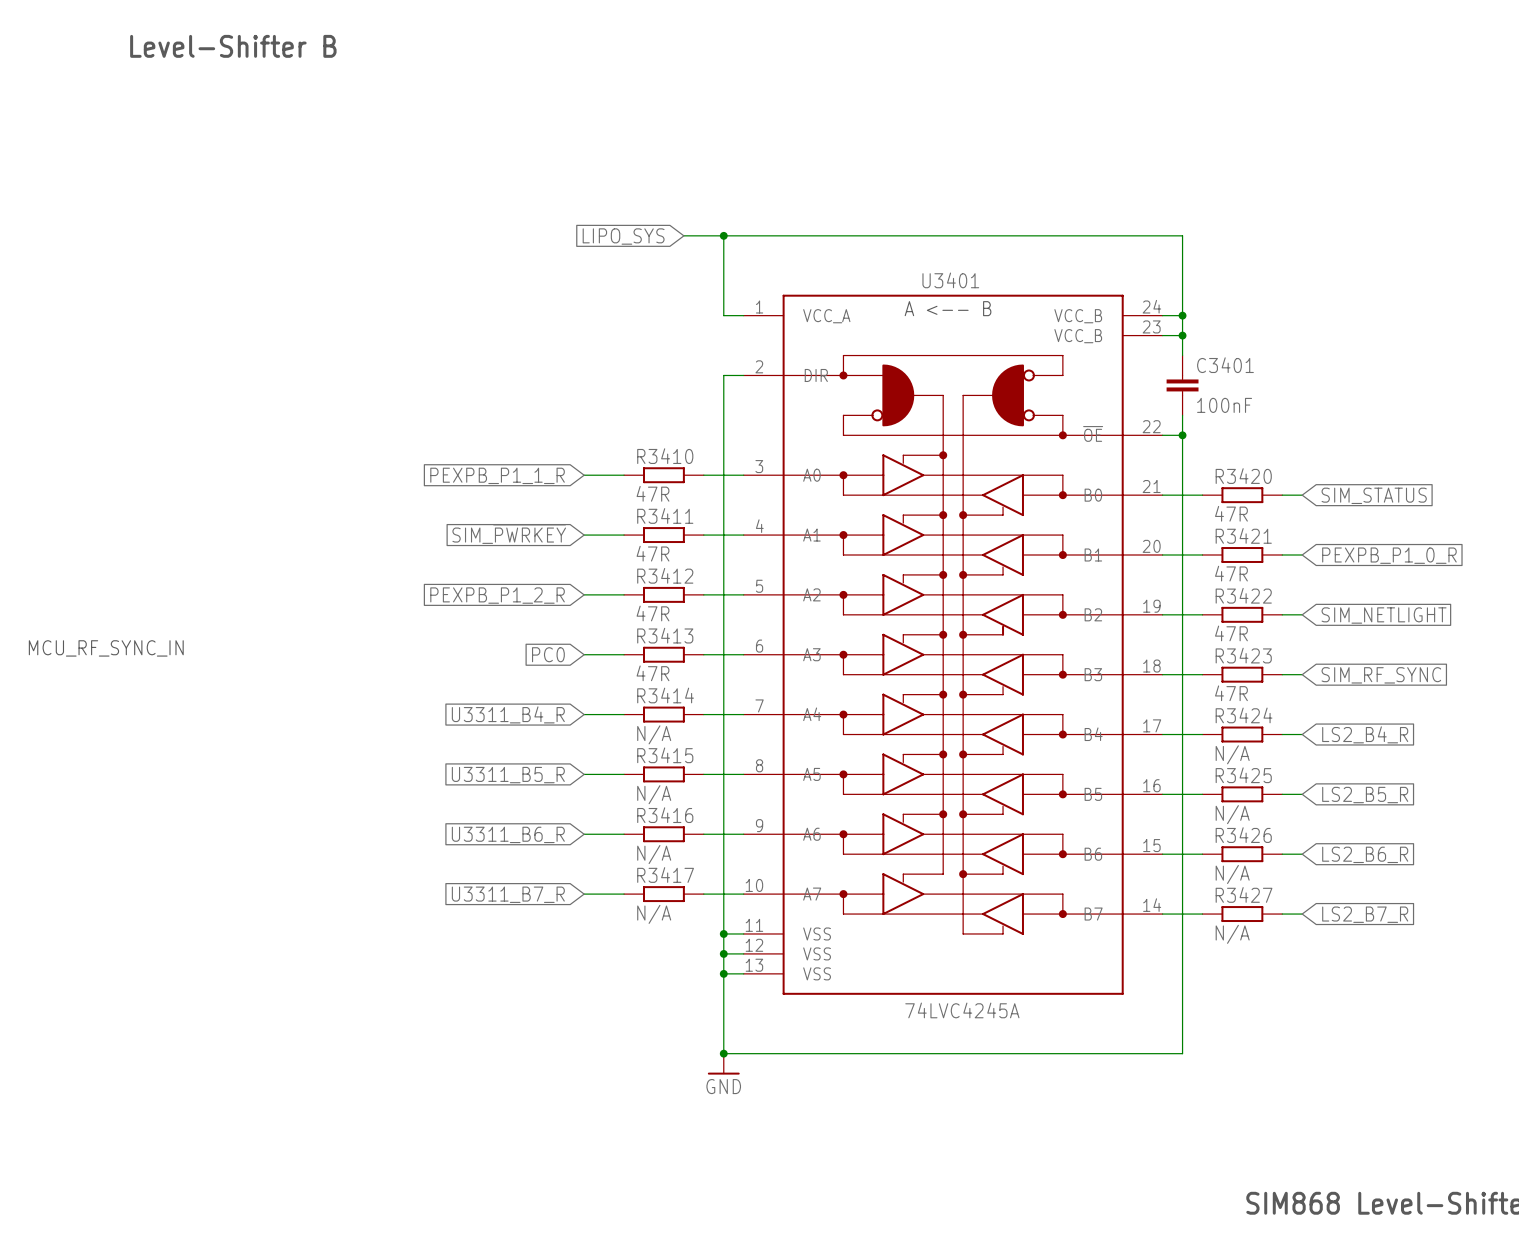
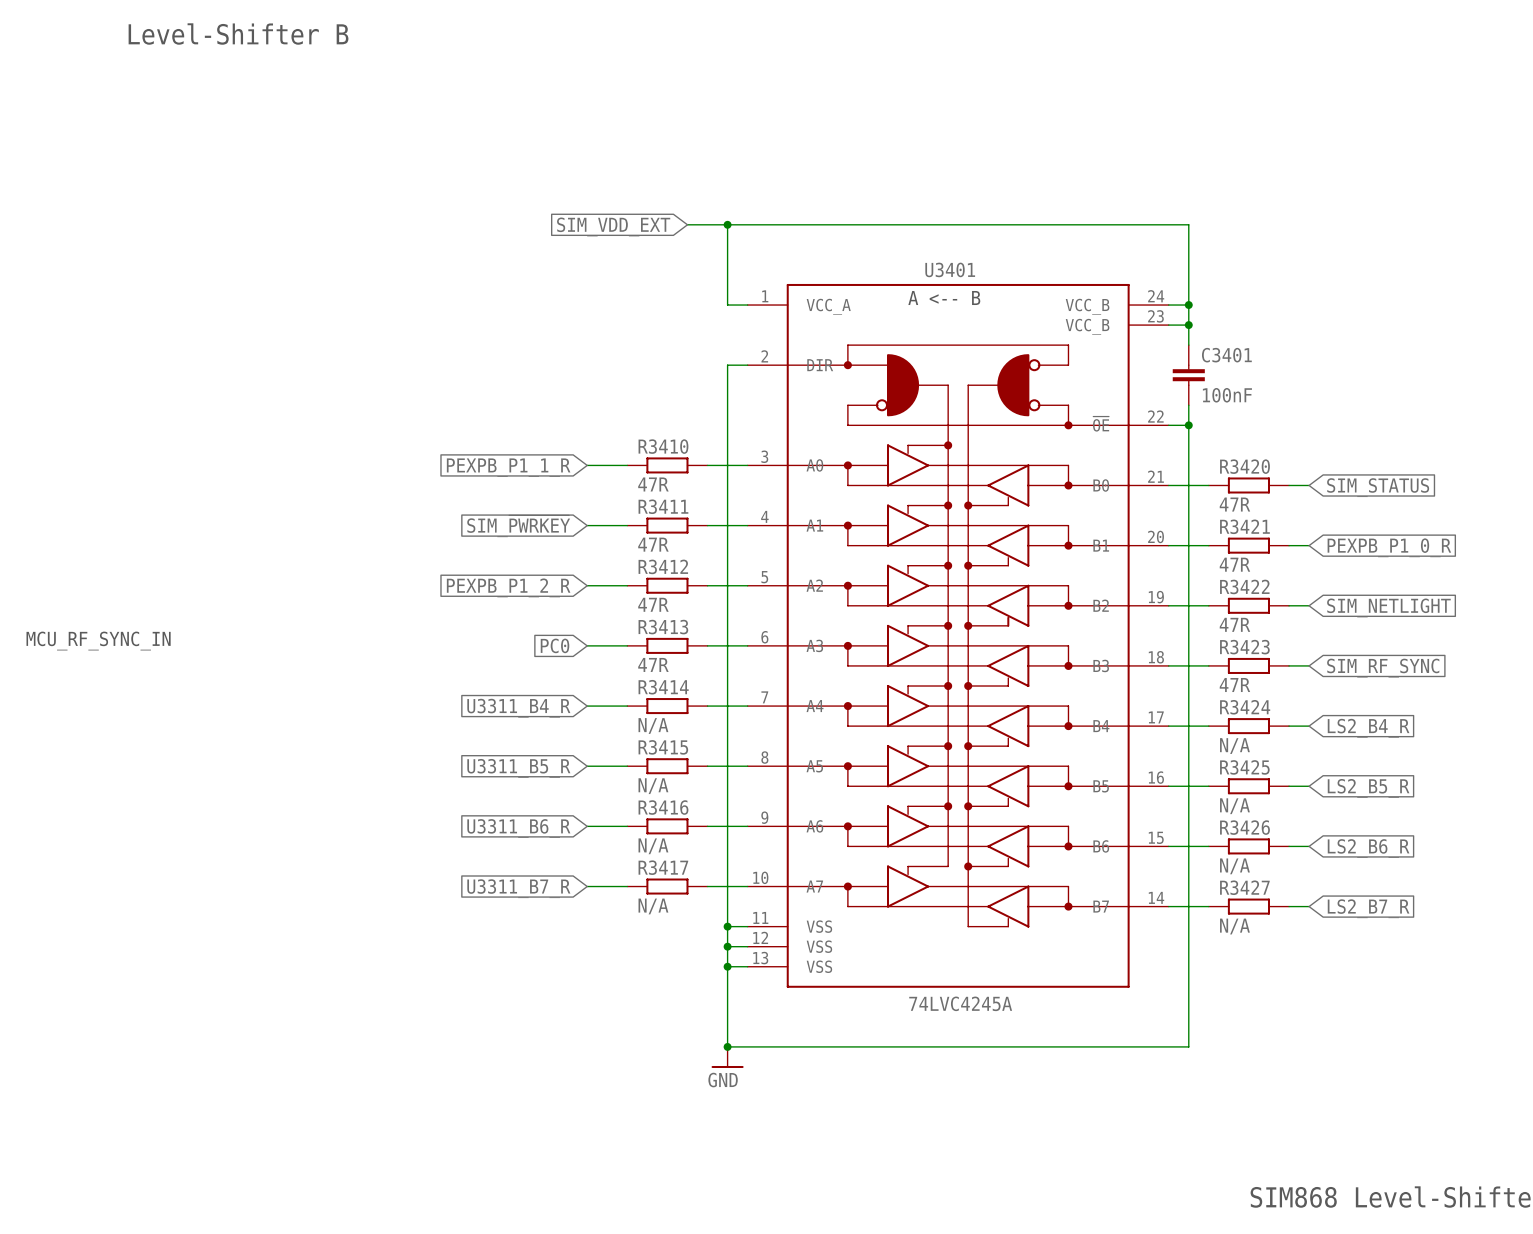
global label: LIPO_SYS (623, 236) -> SIM_VDD_EXT (613, 226)

